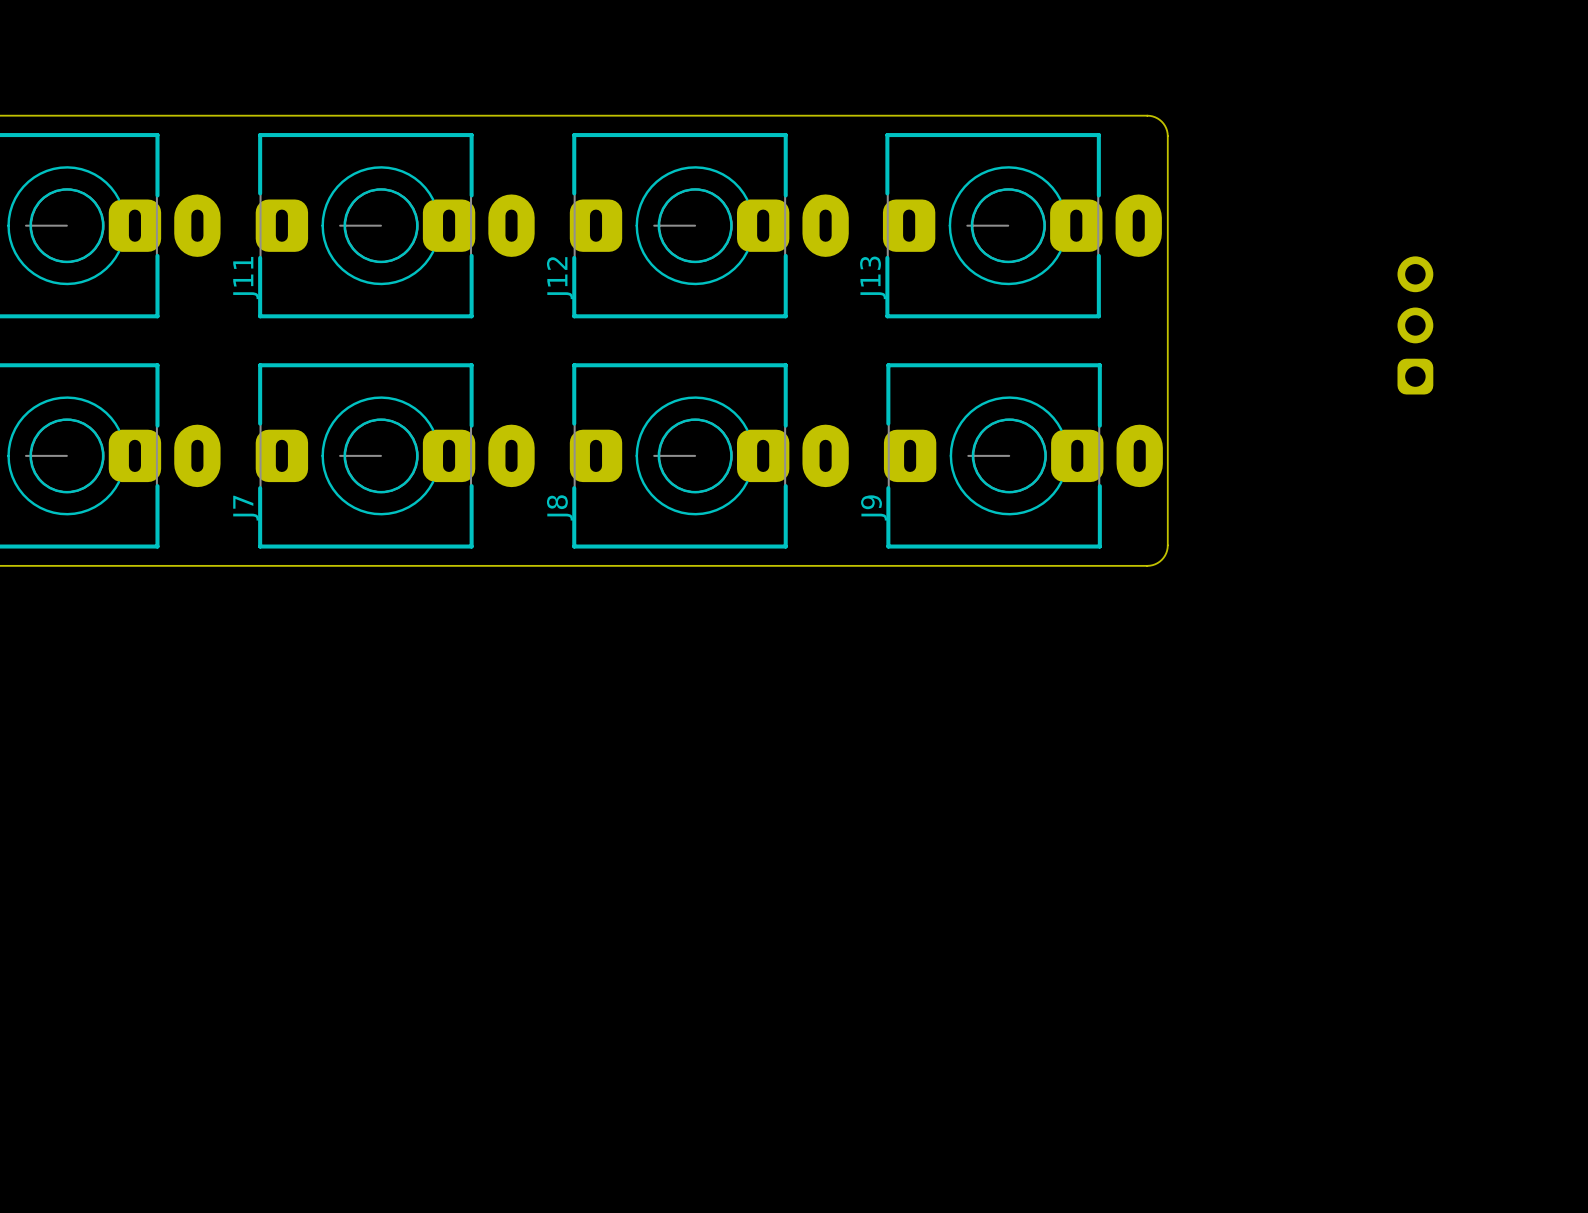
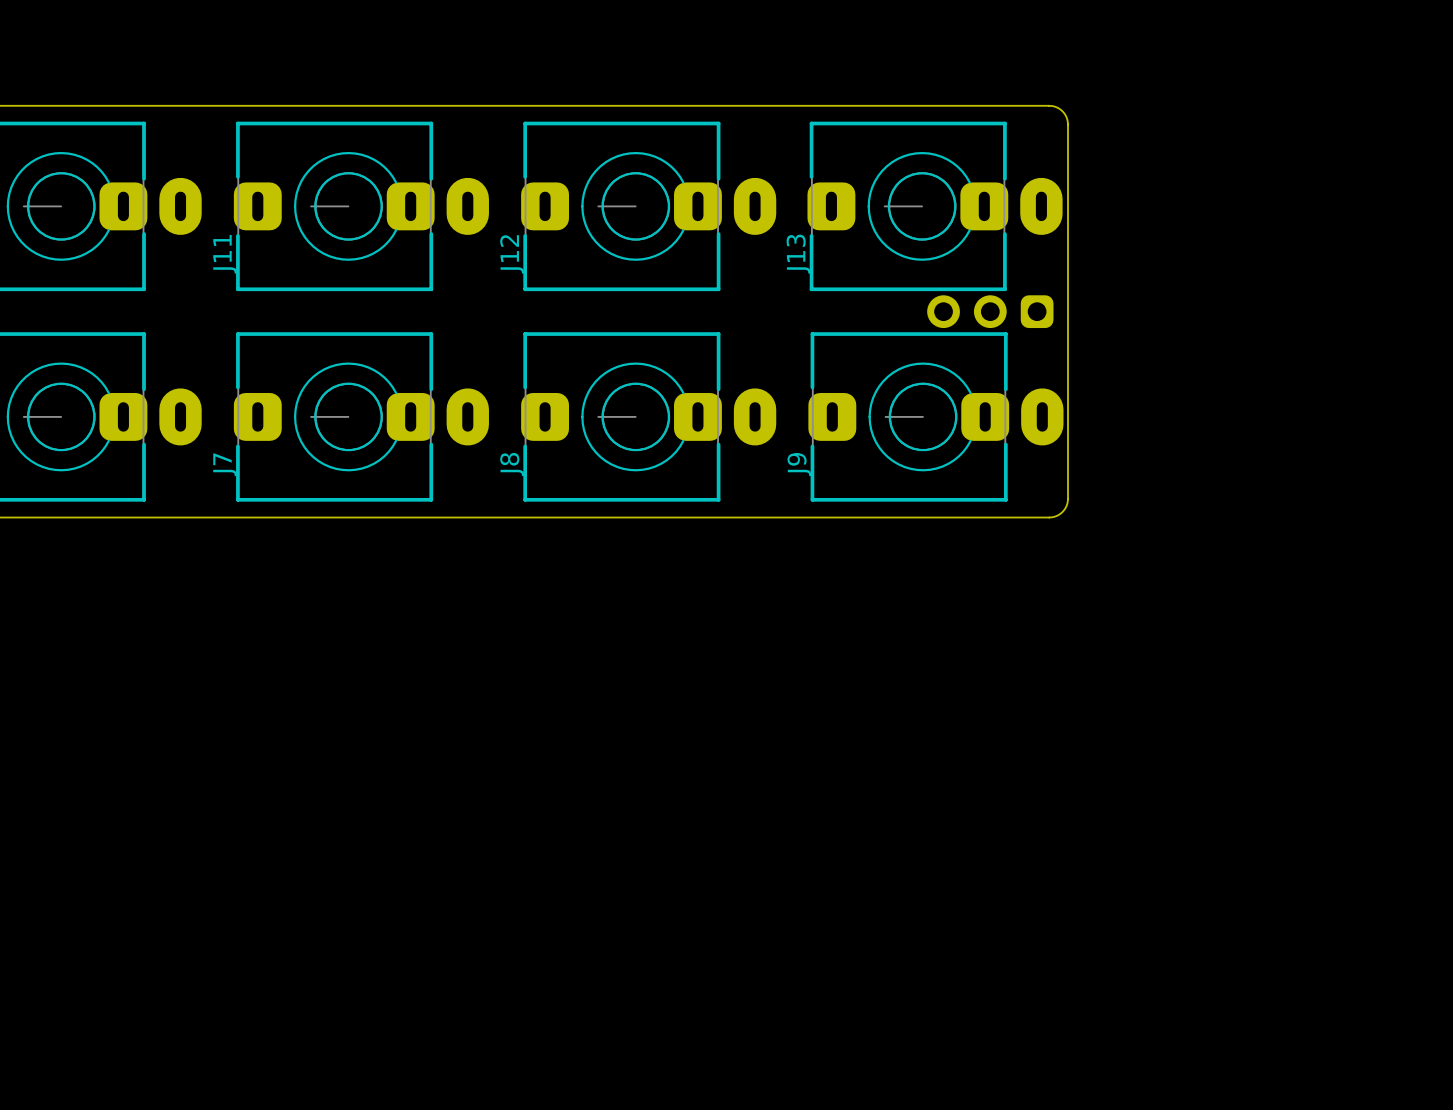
part rotation: 0° (1415, 325) -> 90° counterclockwise (990, 311)
part position: (1415, 325) -> (990, 311)

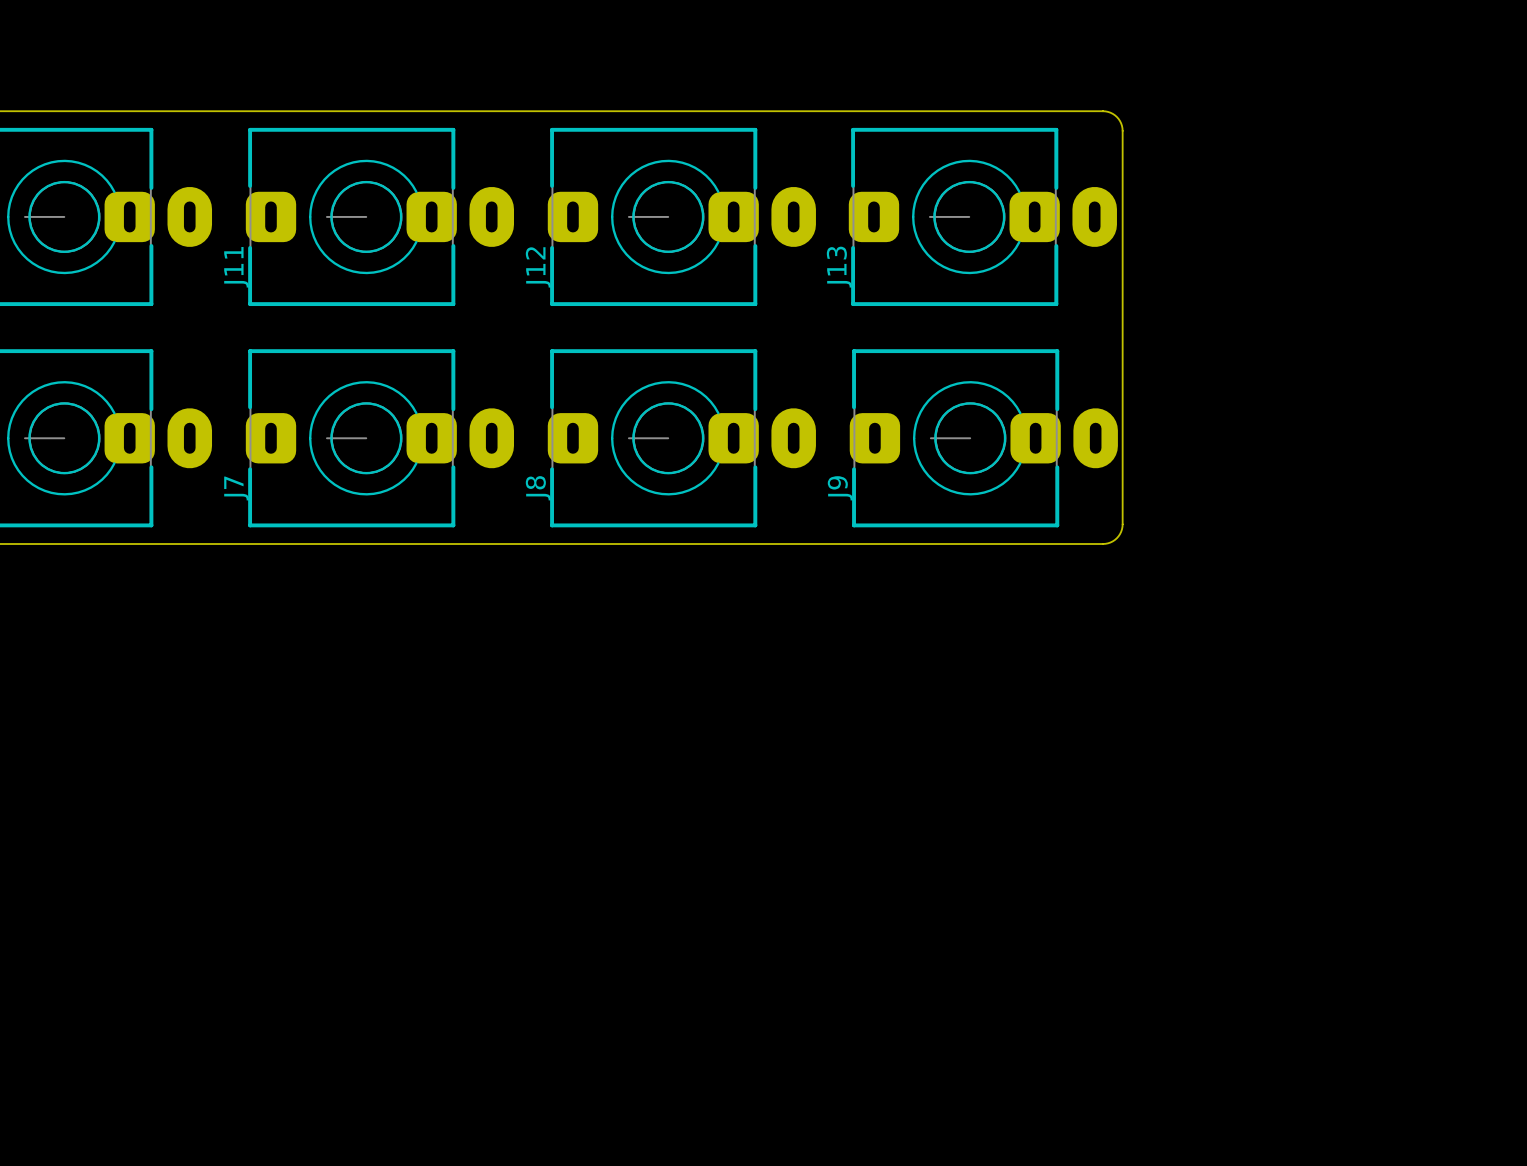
part: (990, 311) -> none

